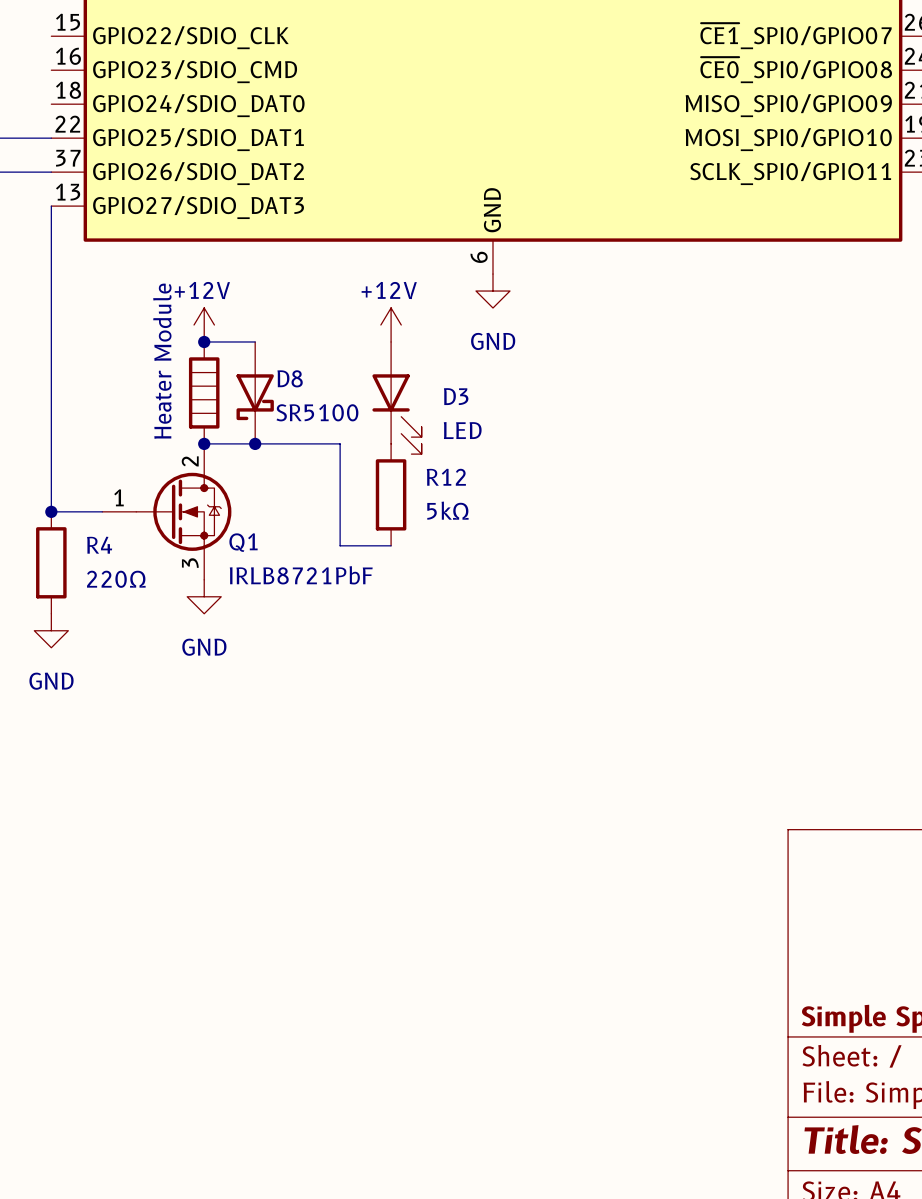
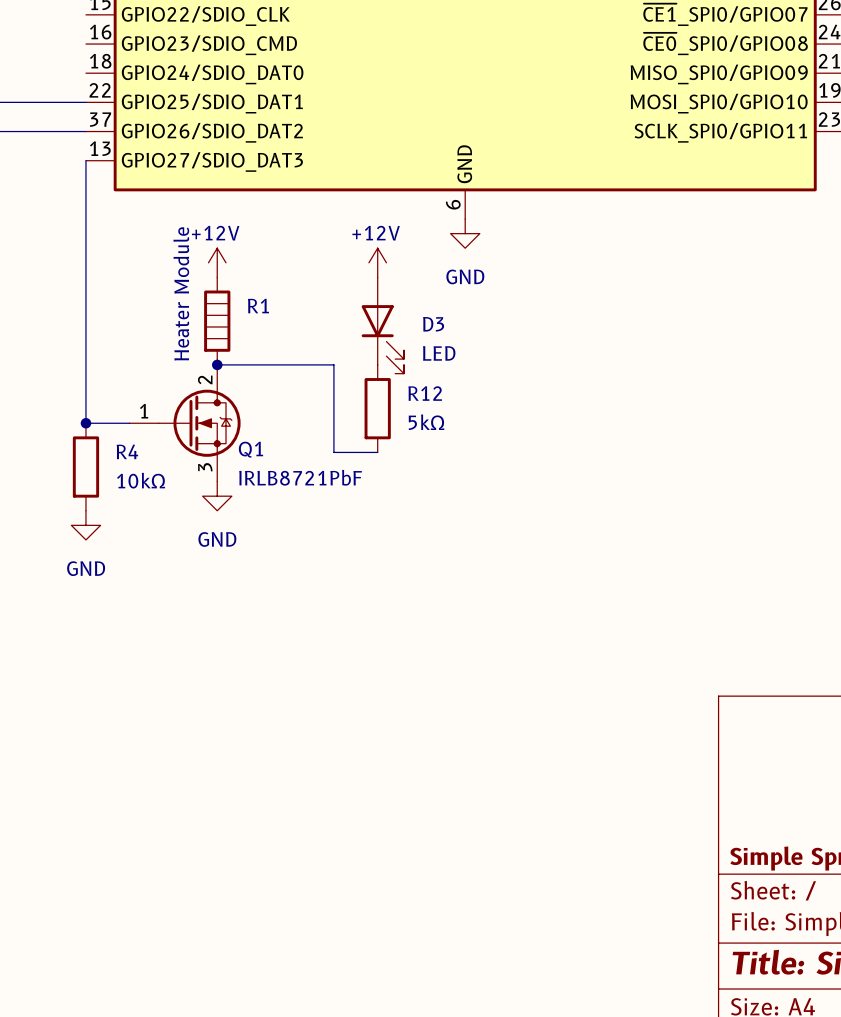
wire: (204, 341) (255, 341) -> none
junction: (204, 341) -> none
R1 name: none -> R1 (258, 306)
D8: SR5100 (255, 392) -> none
junction: (255, 443) -> none
R4 value: 220Ω (116, 579) -> 10kΩ (141, 480)

